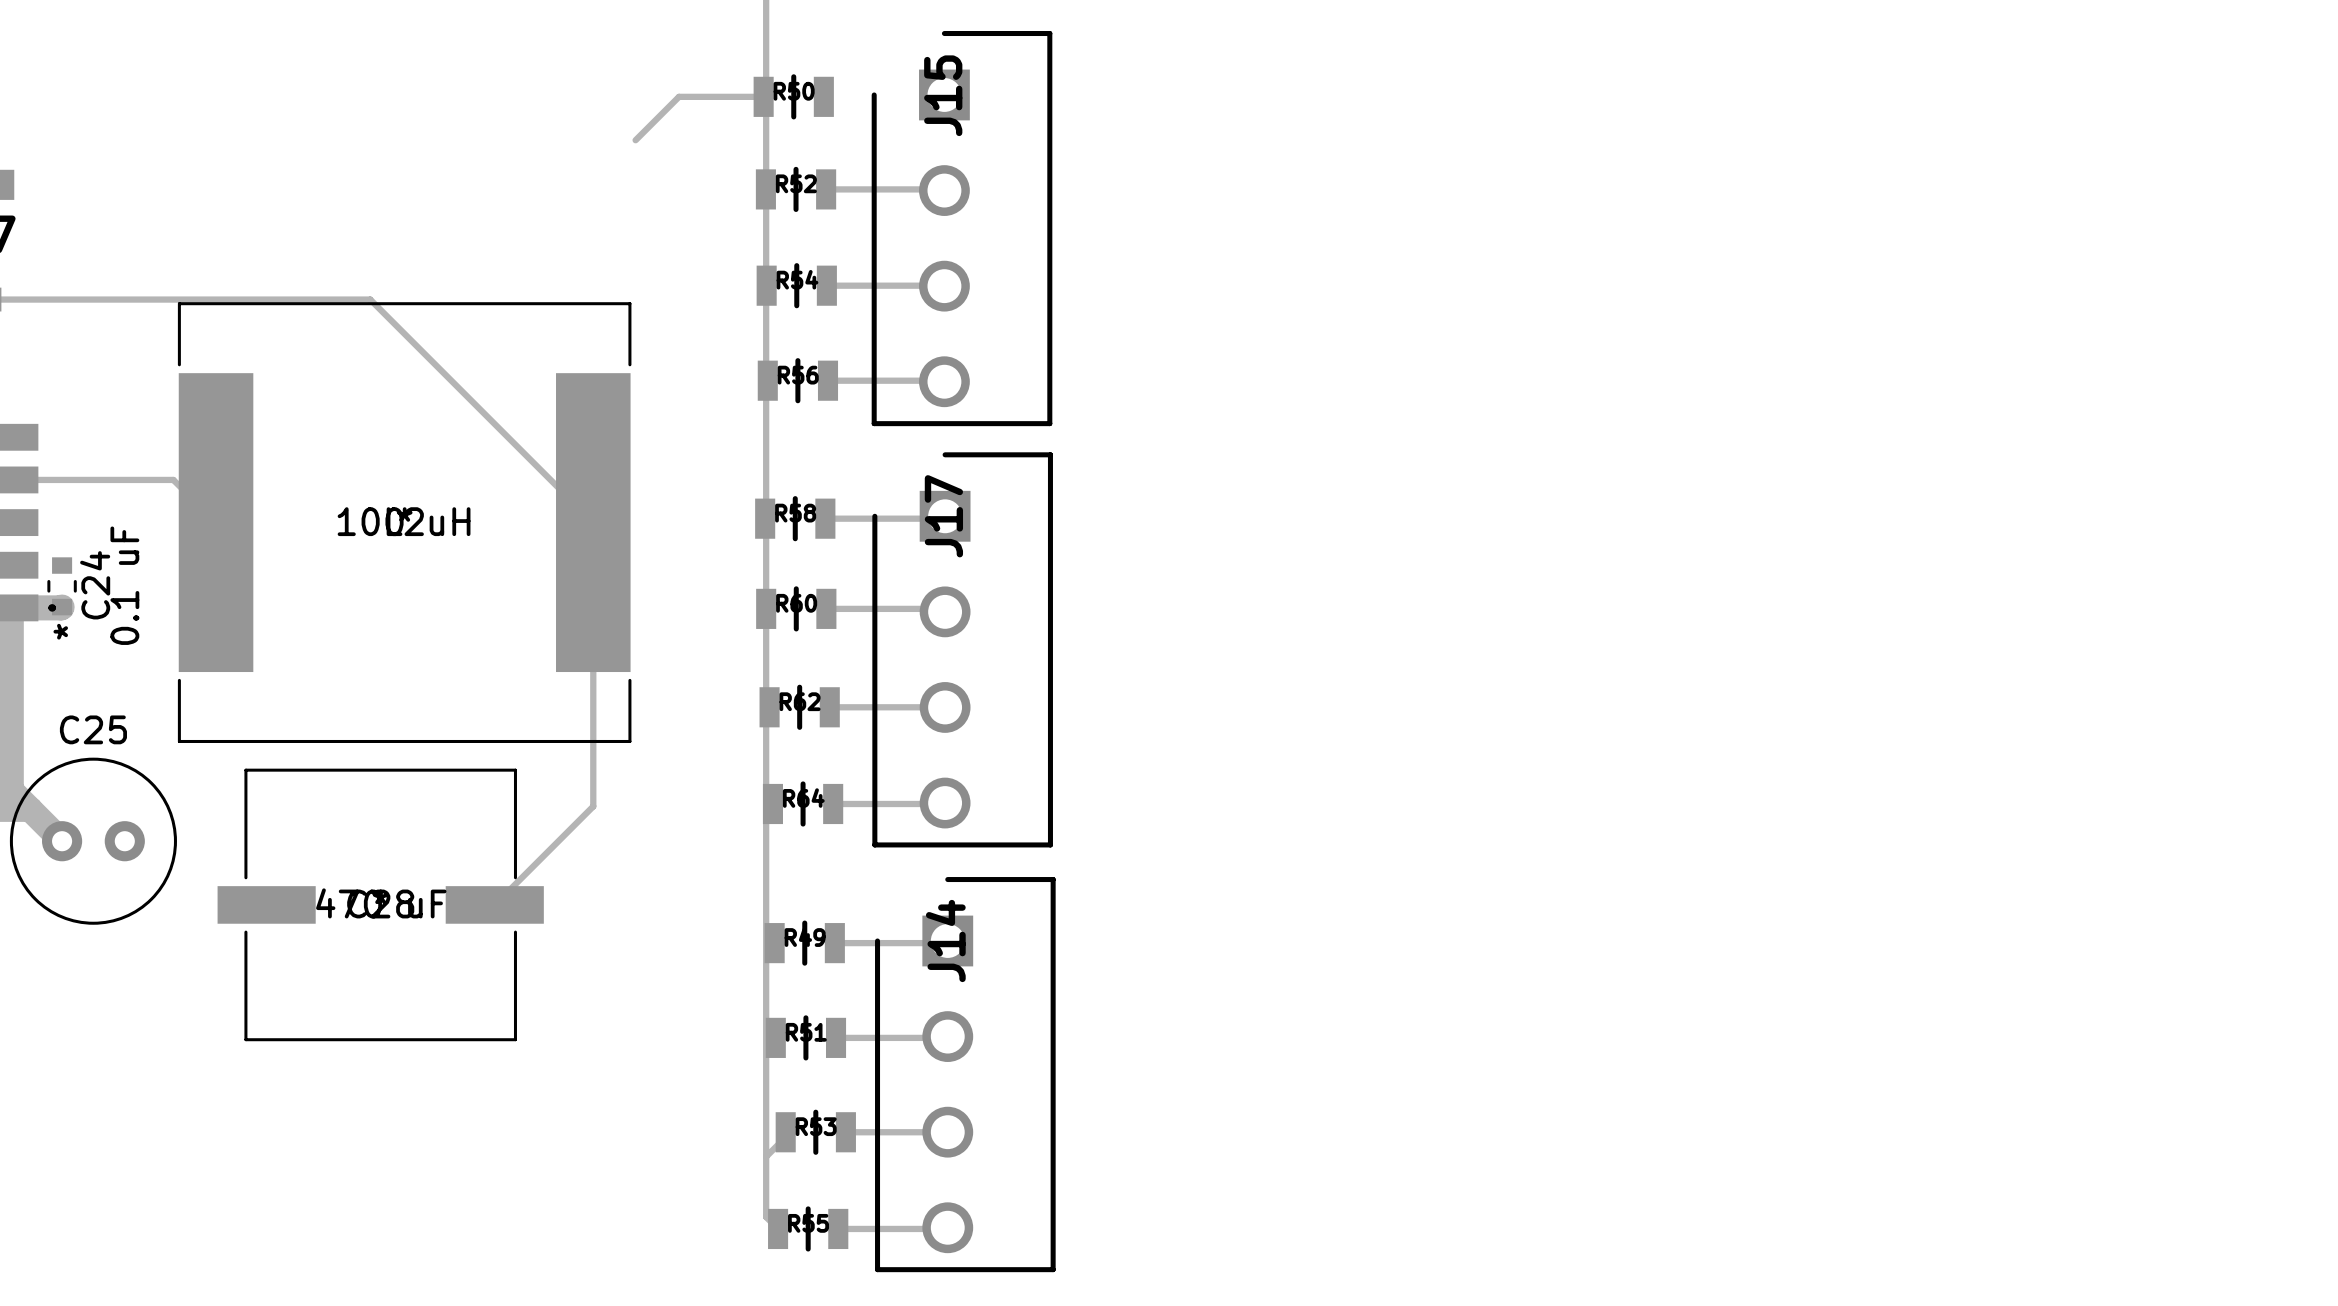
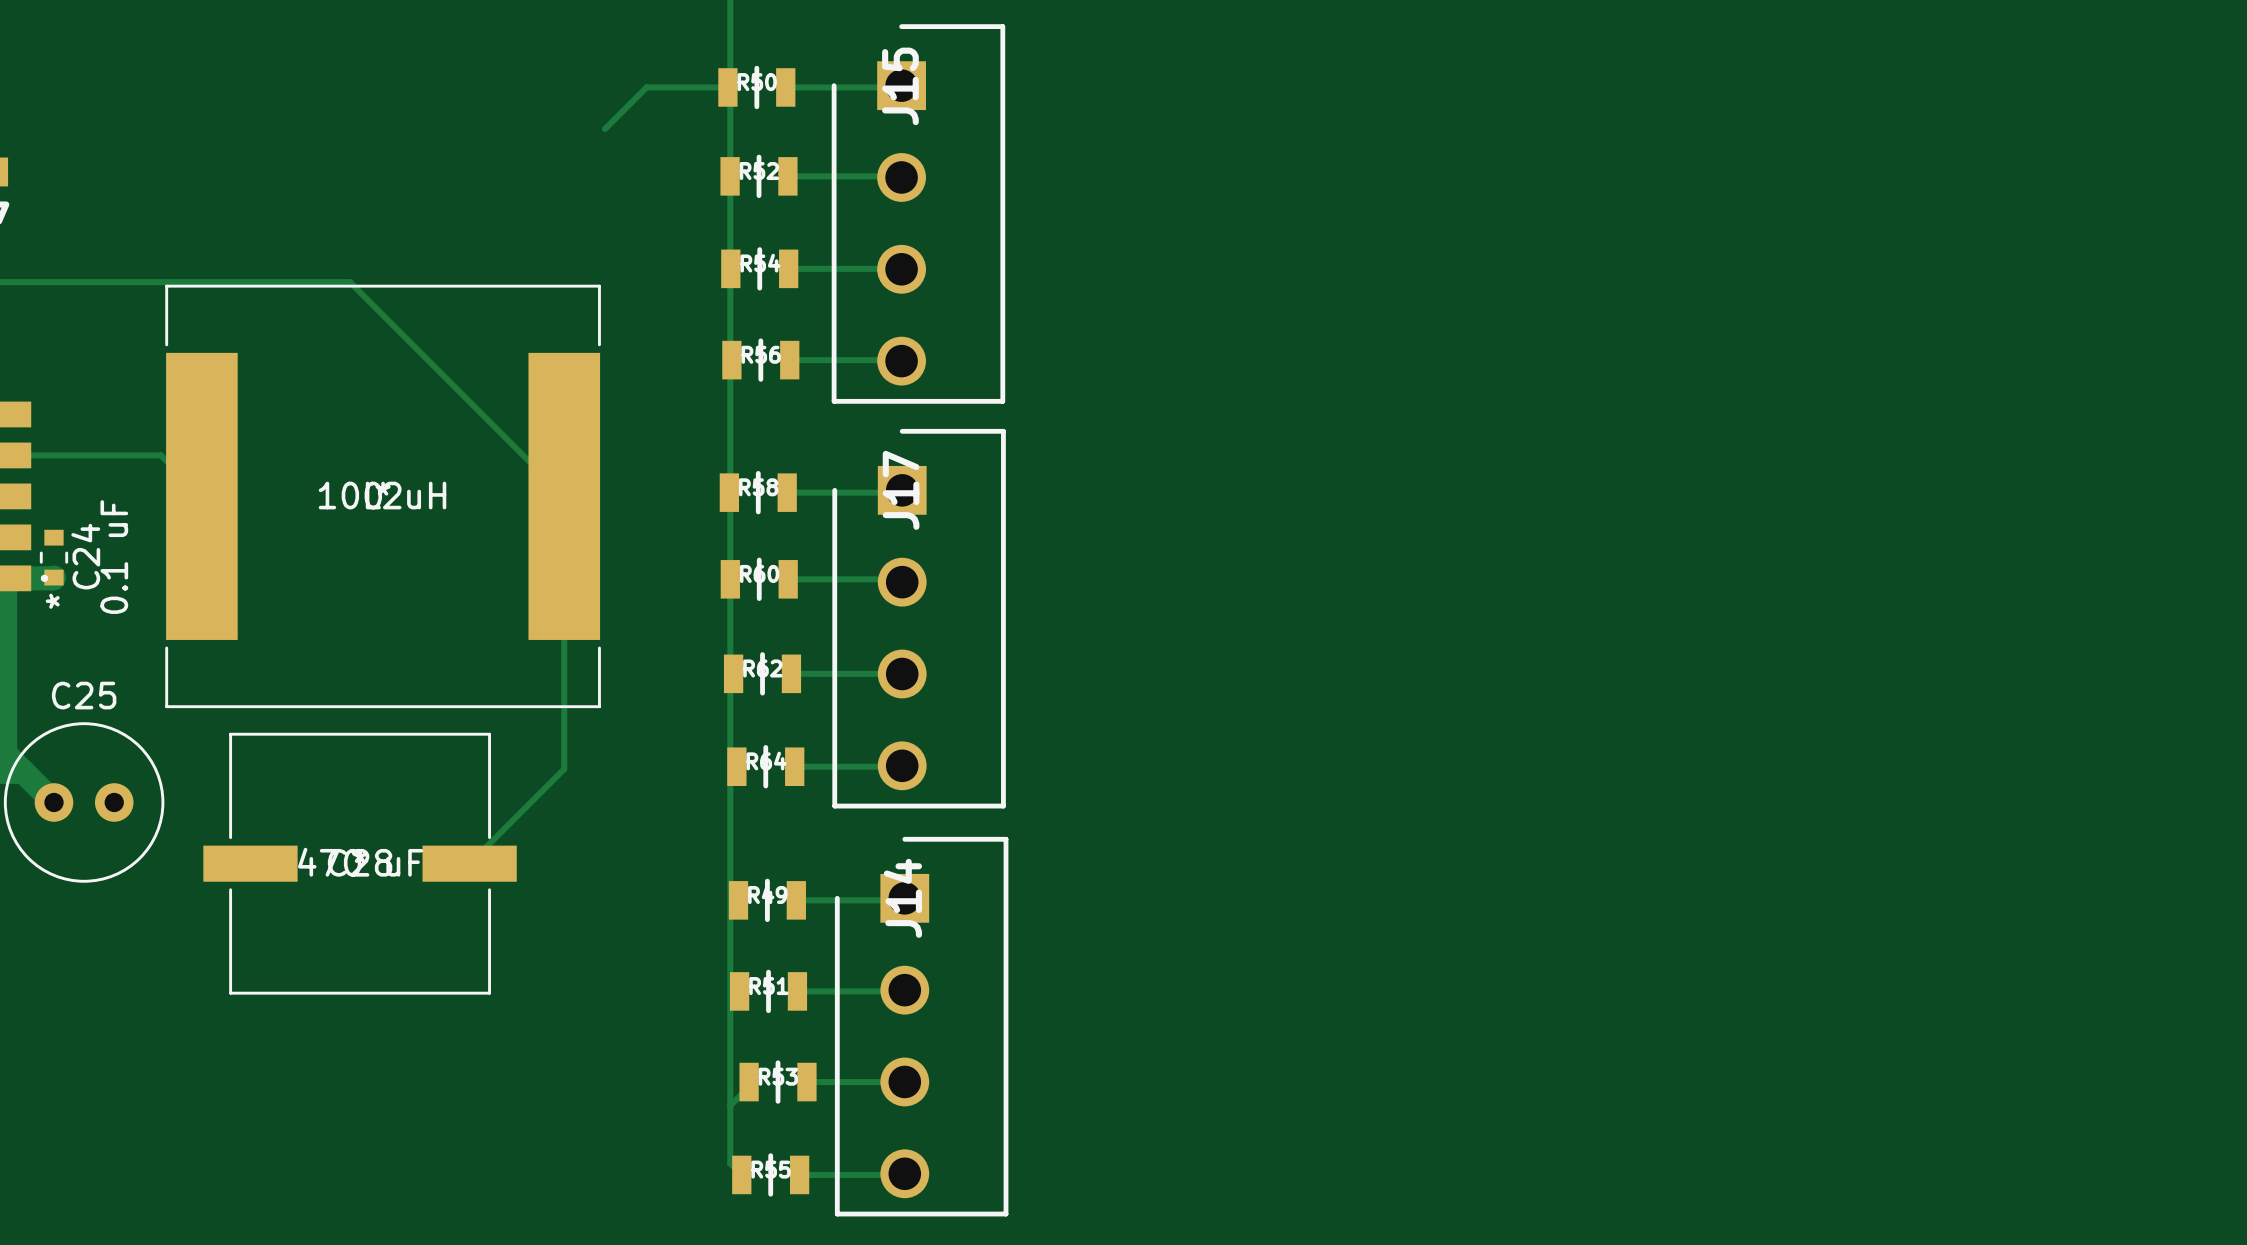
track: none -> (901, 85) (899, 87) (785, 87)

